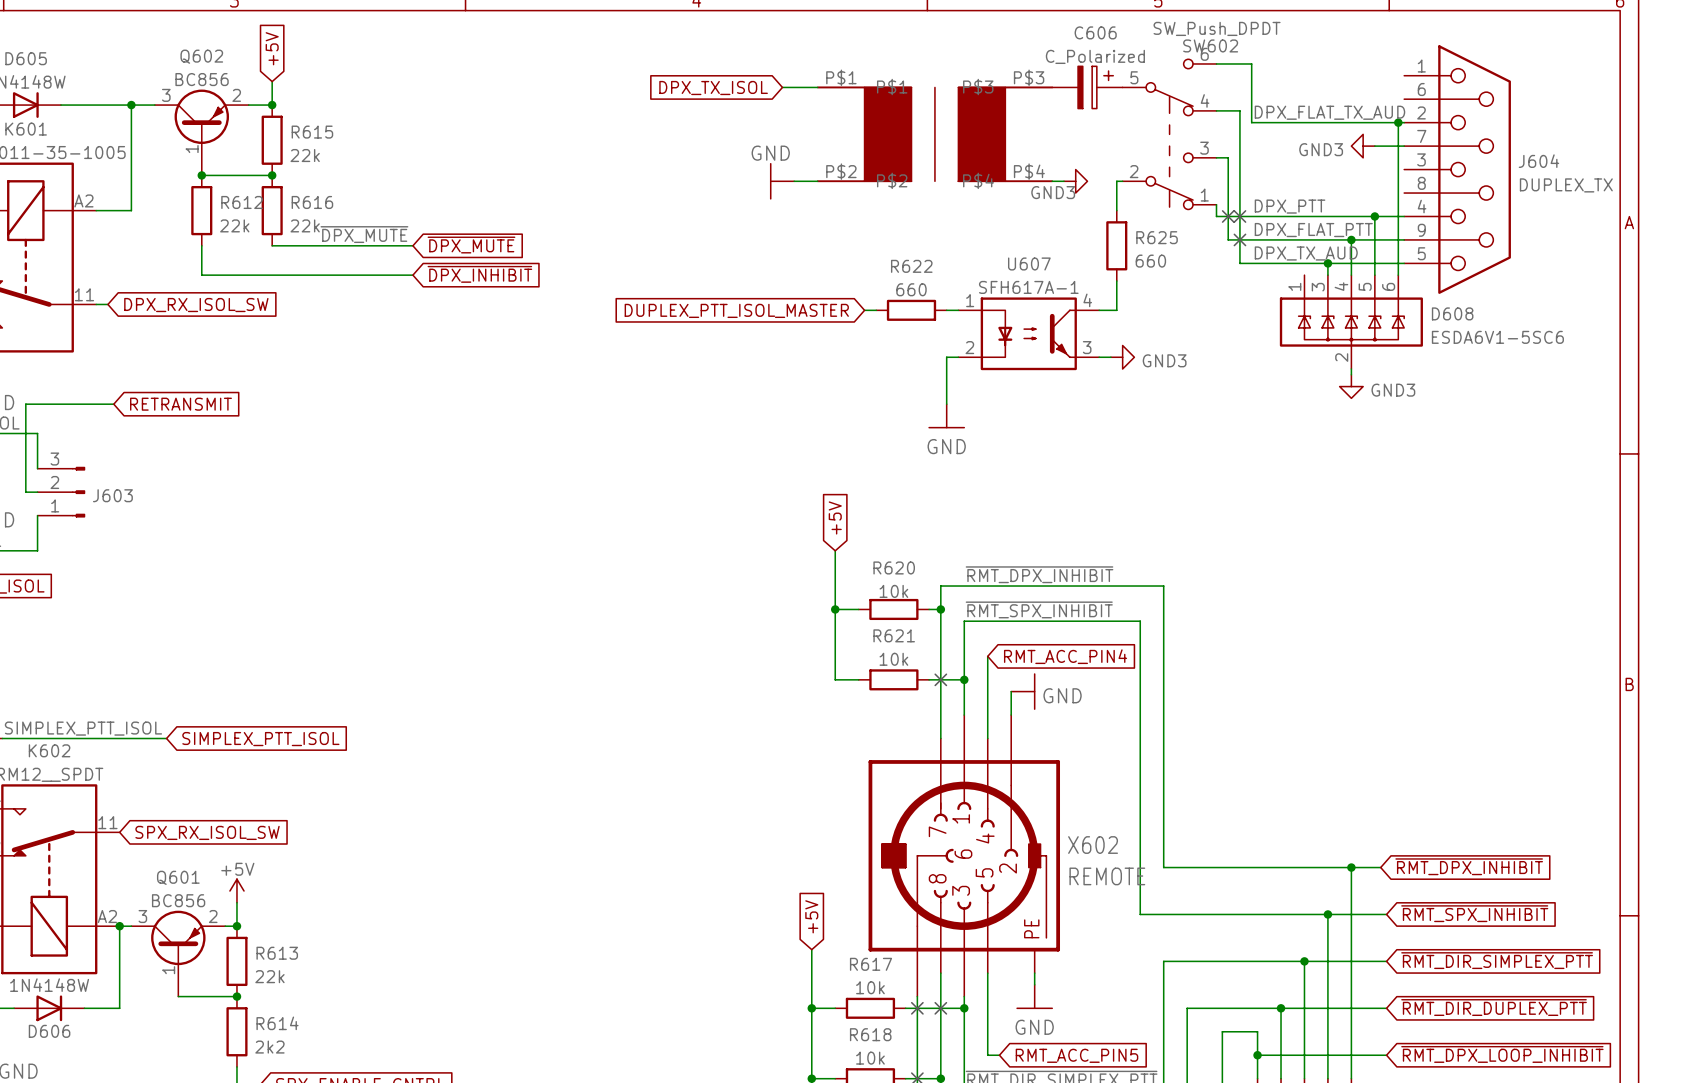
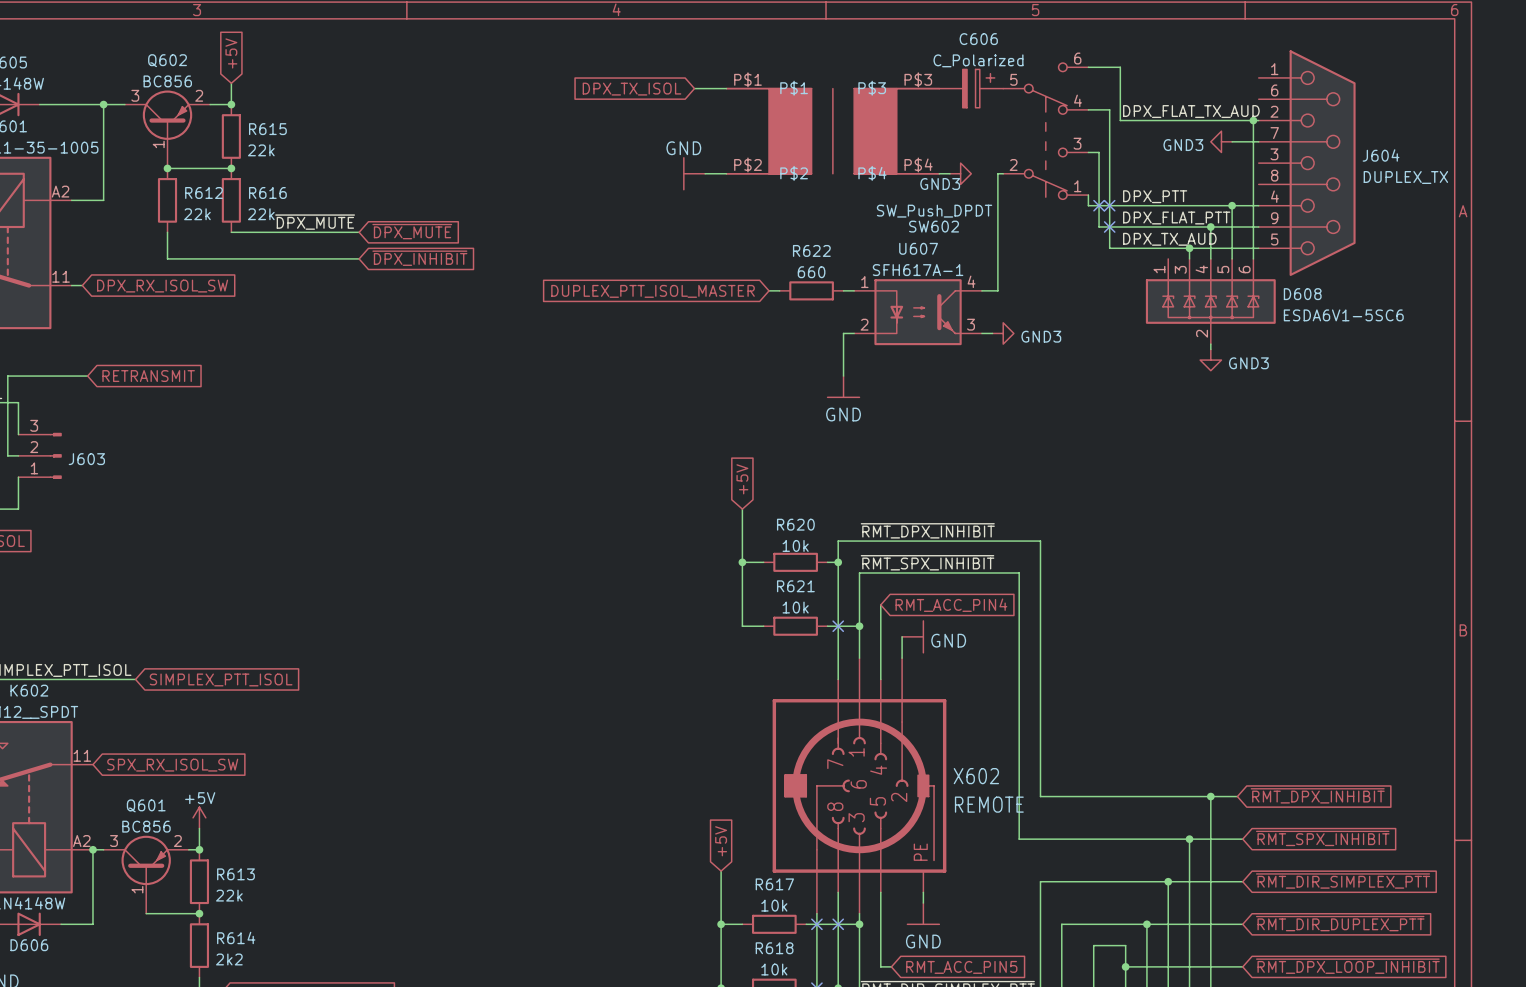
SW602 value position: SW_Push_DPDT (1217, 28) -> SW_Push_DPDT (934, 211)
SW602 name position: SW602 (1210, 45) -> SW602 (934, 226)
wire: none -> (997, 200) (997, 264)
R625: 660 (1116, 245) -> none

